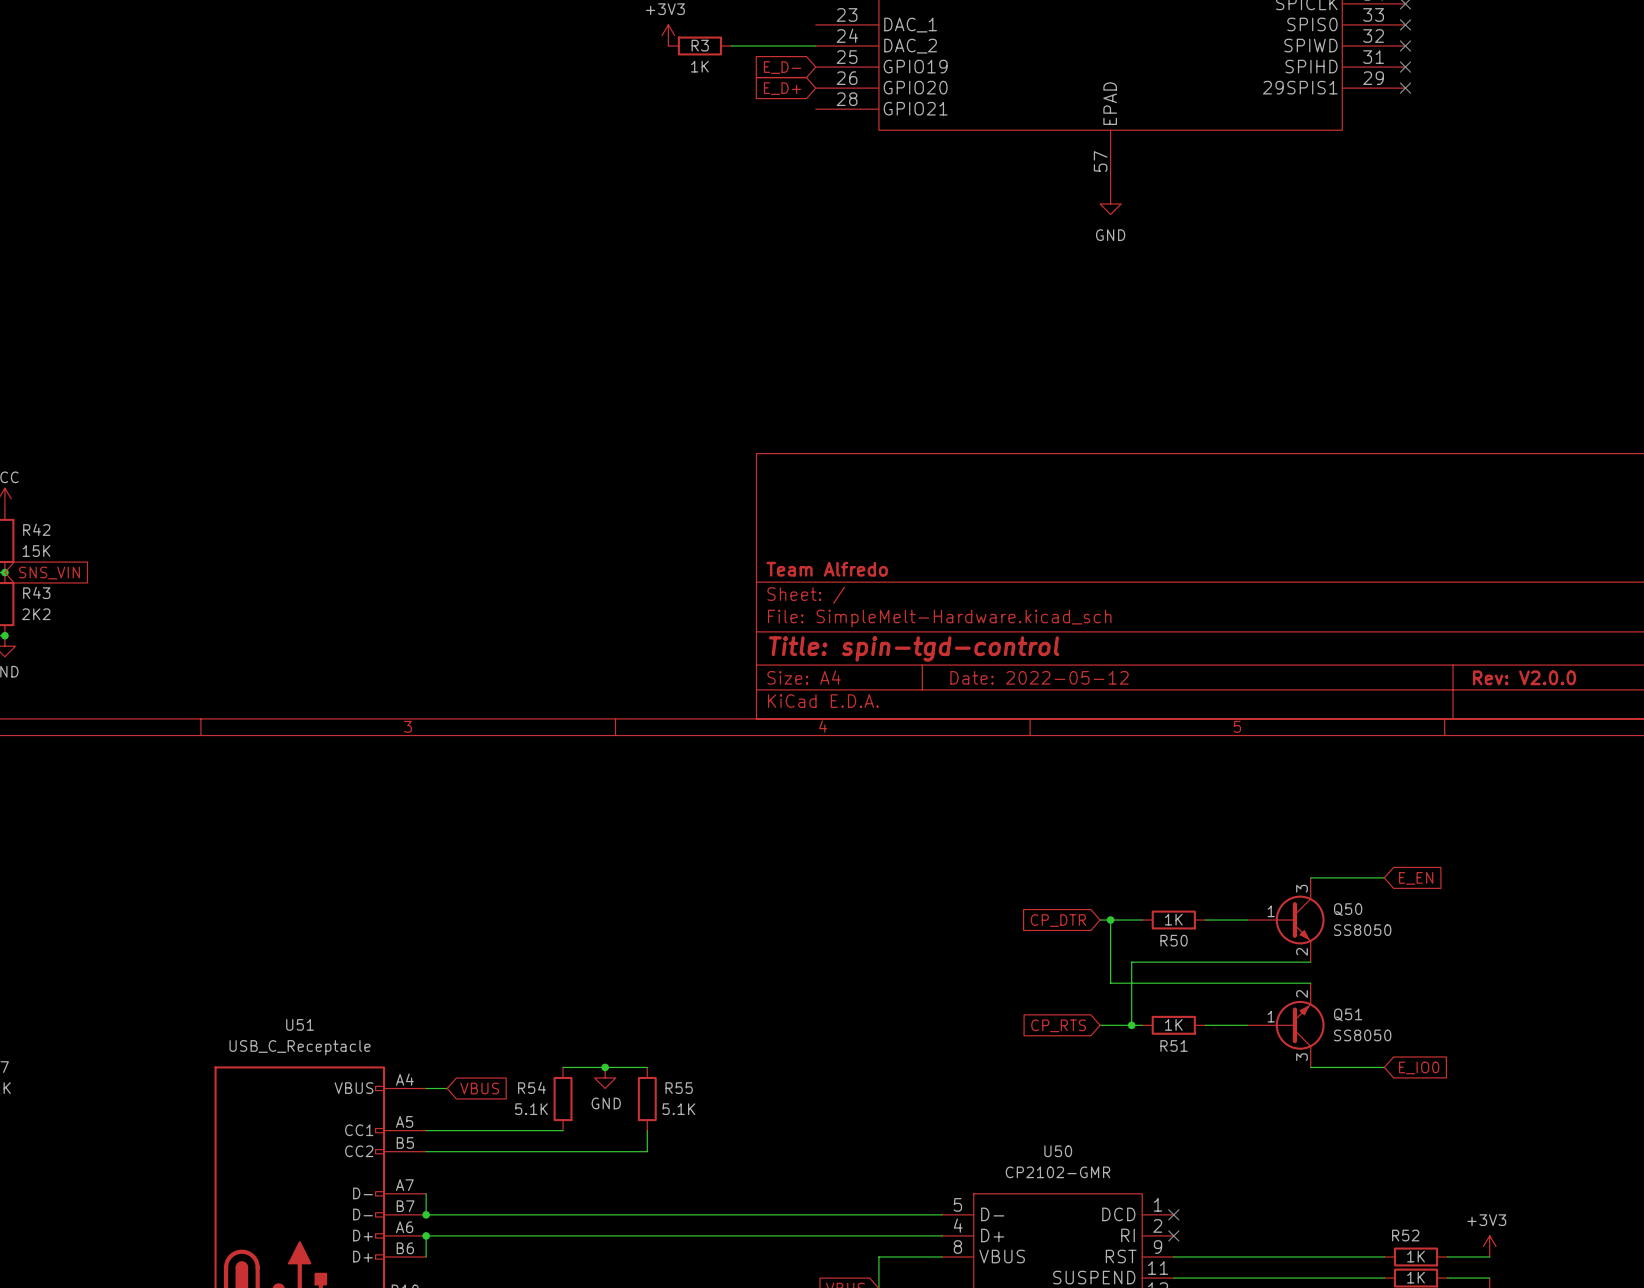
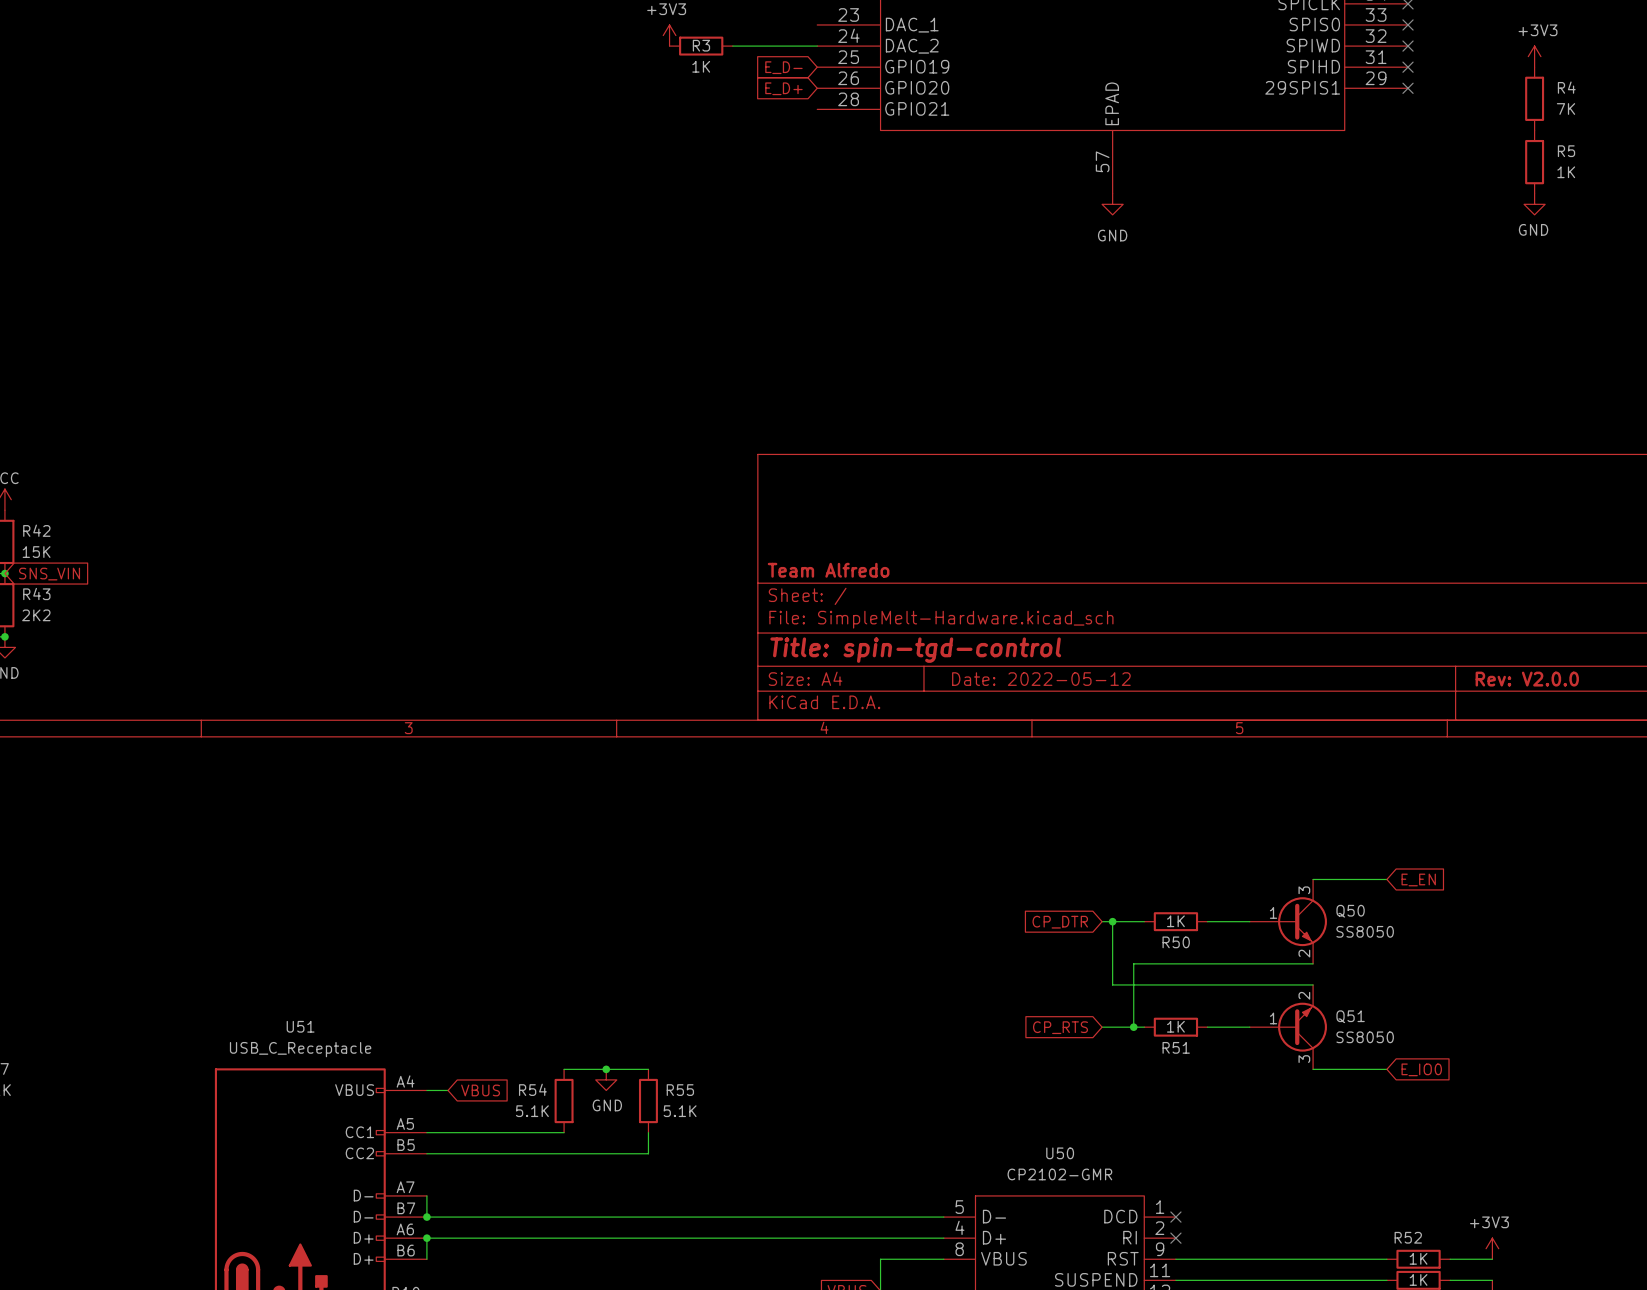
power symbol: none -> +3V3 (1534, 56)
R4: none -> 7K (1534, 98)
R5: none -> 1K (1534, 162)
power symbol: none -> GND (1534, 204)

